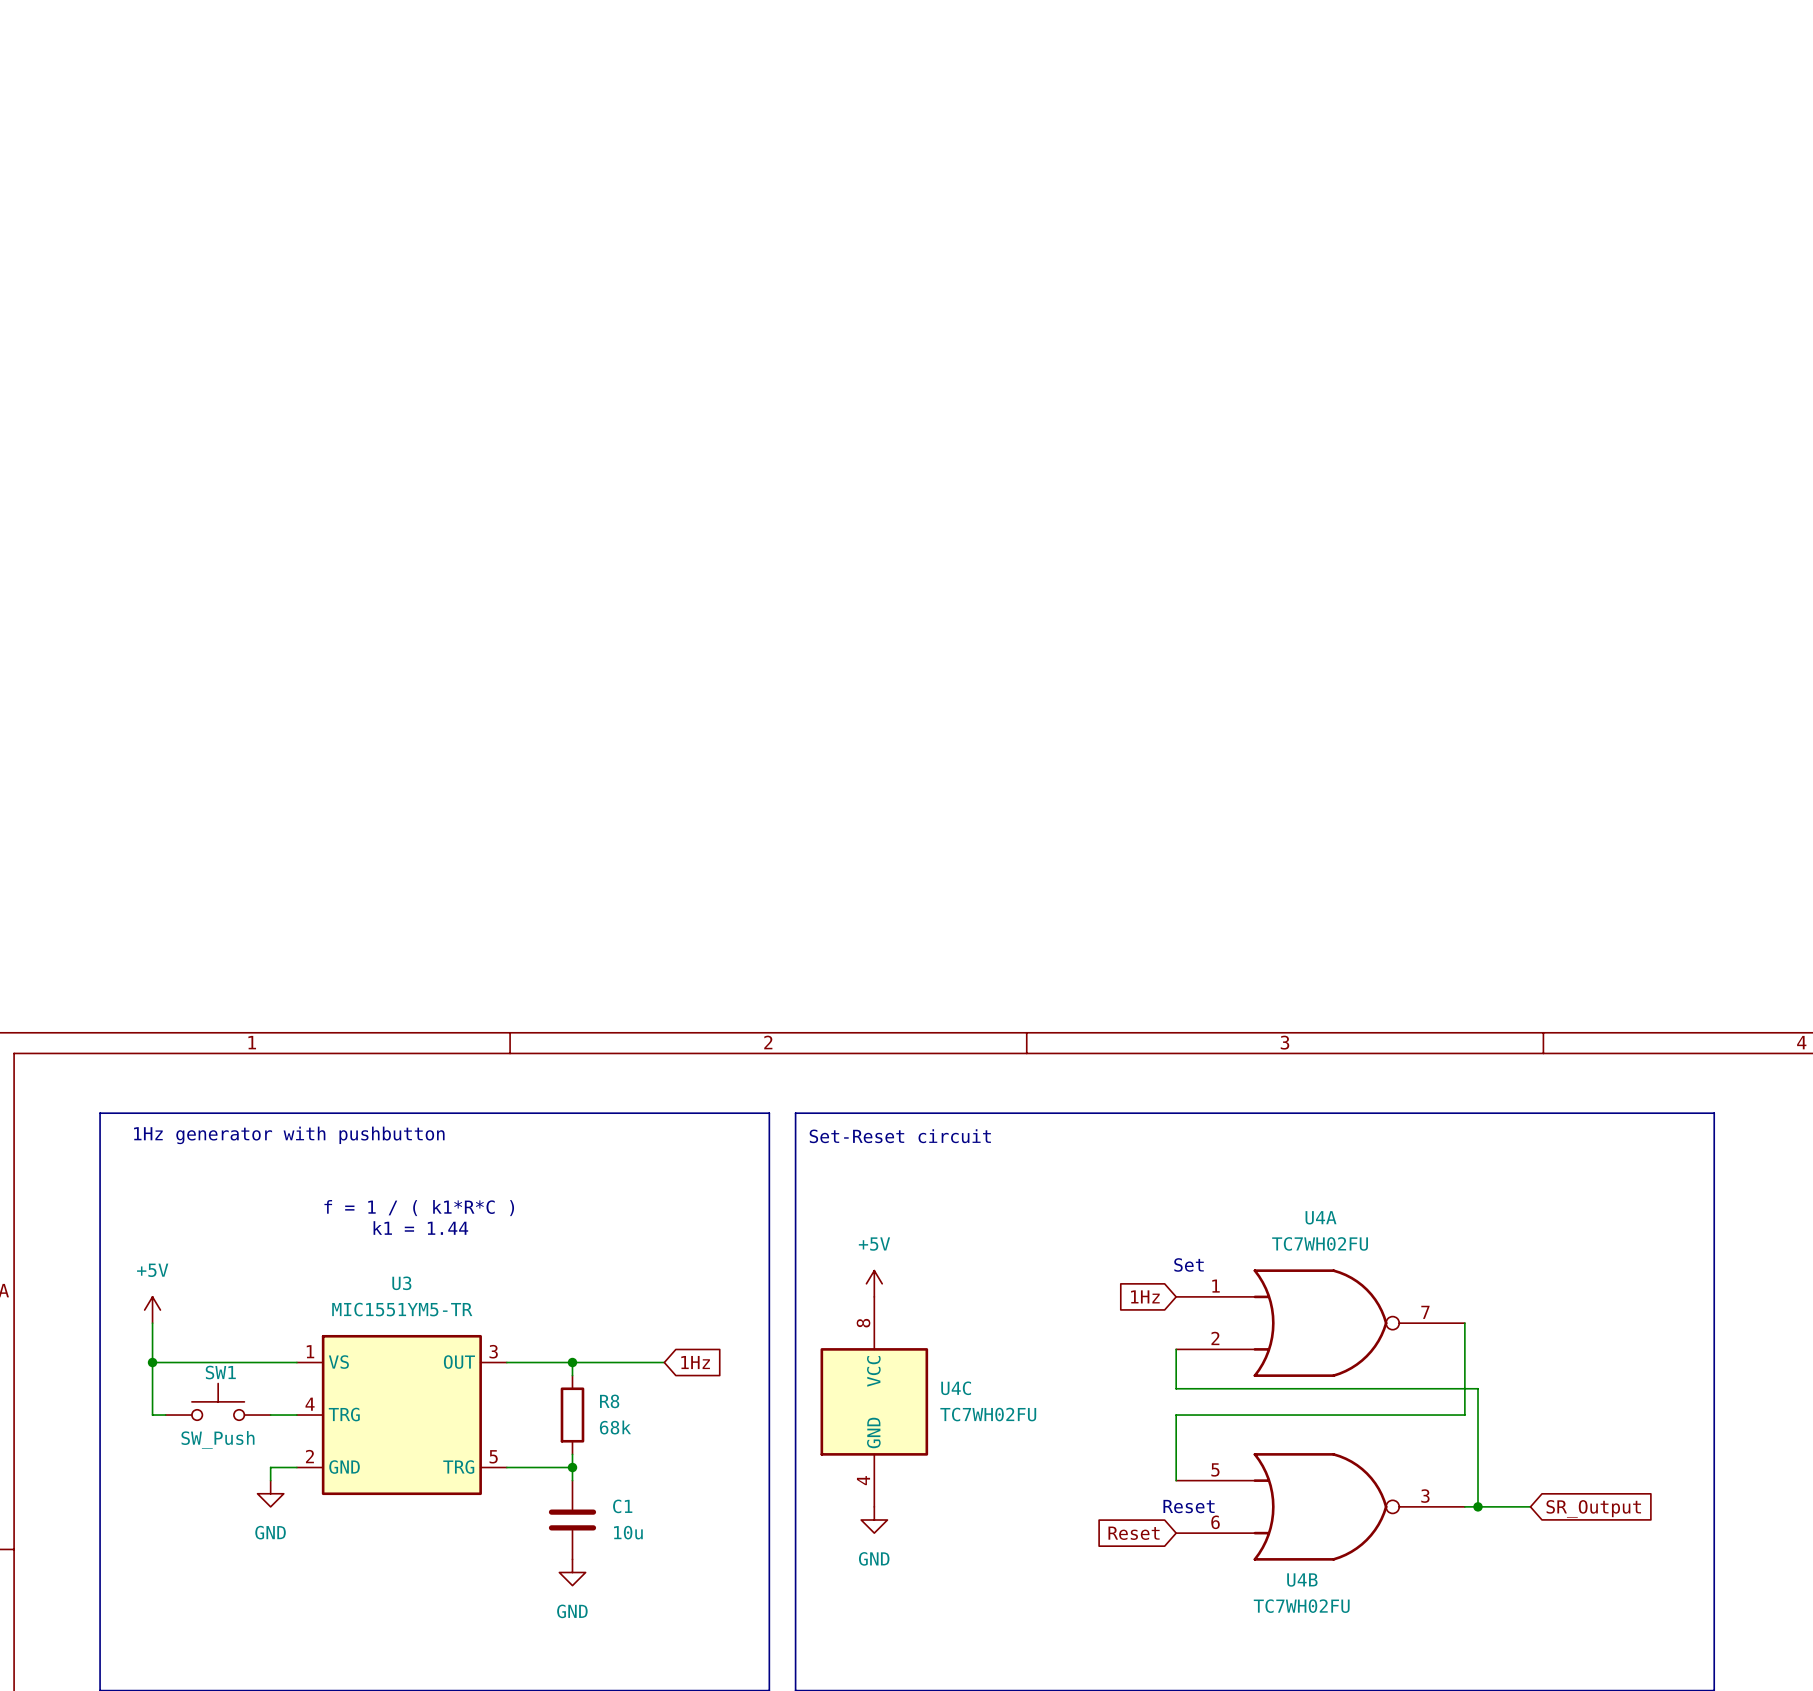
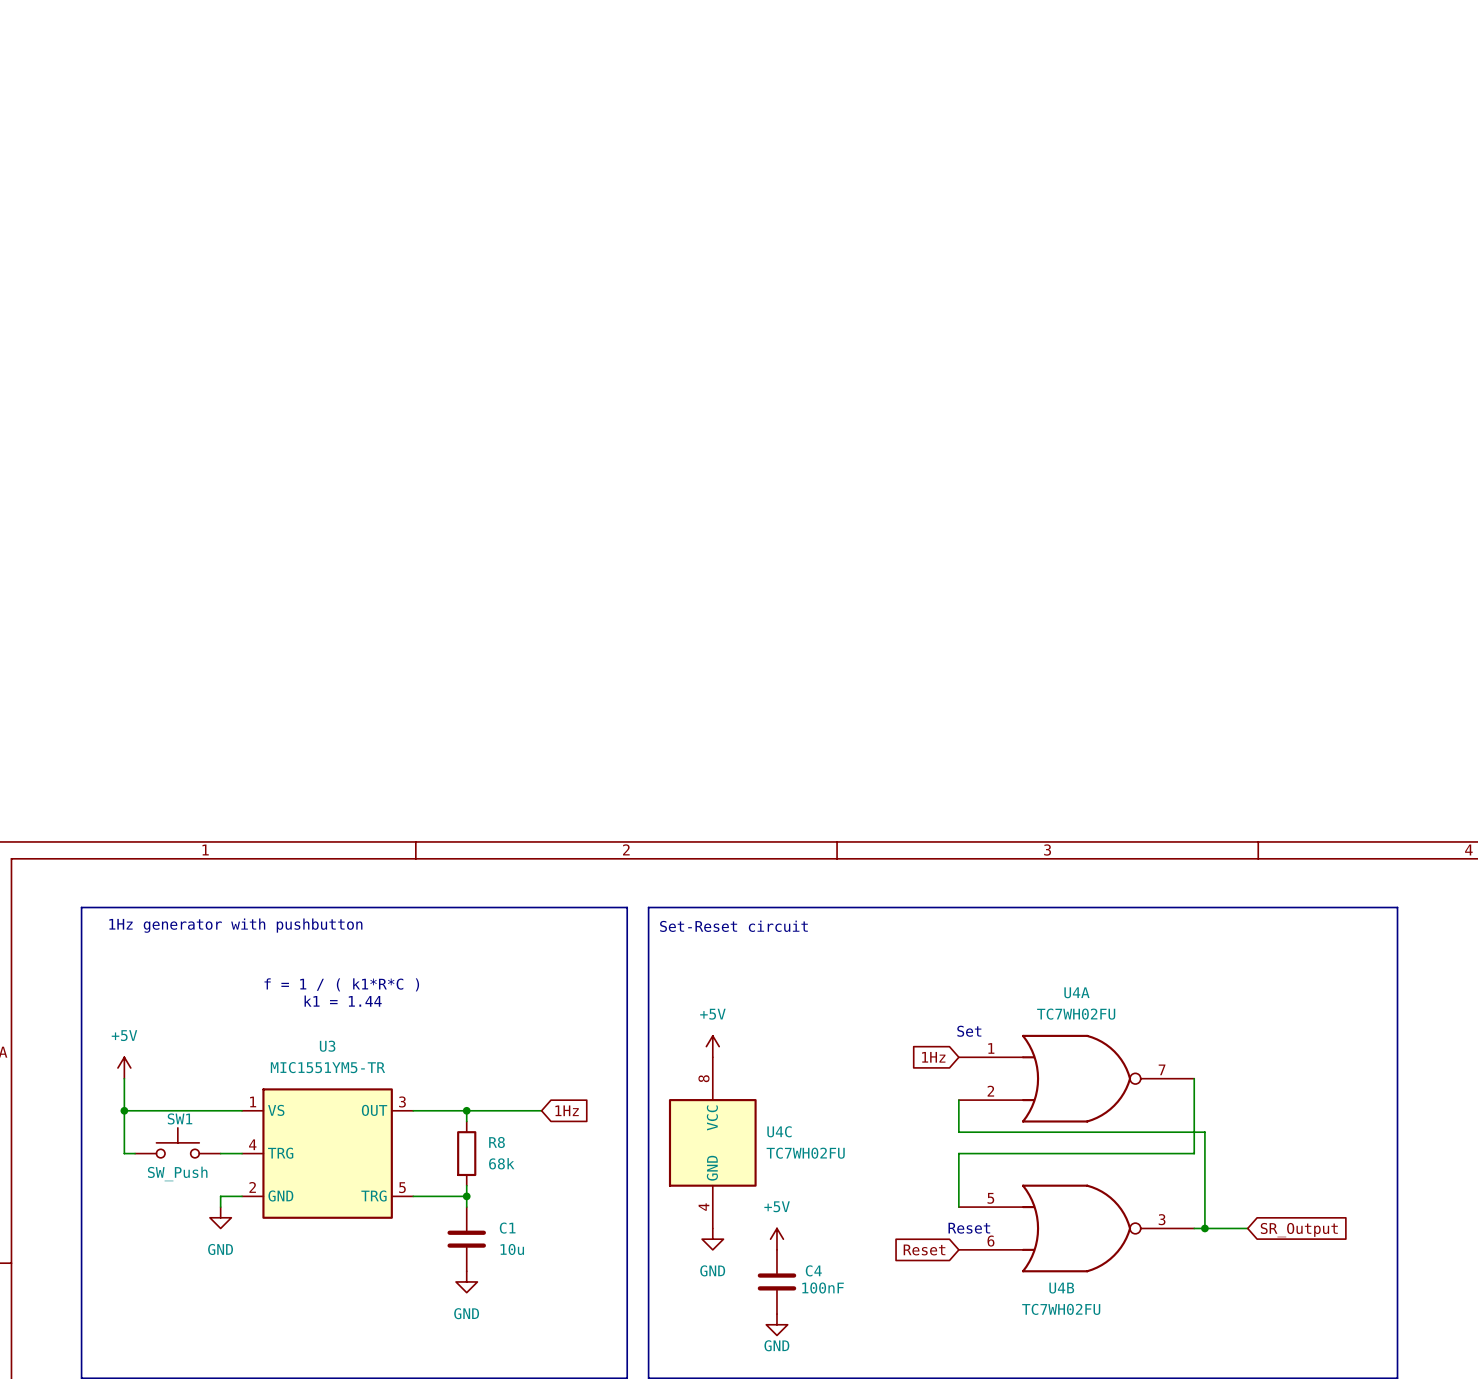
power symbol: none -> +5V (776, 1239)
C4: none -> 100nF (776, 1281)
power symbol: none -> GND (776, 1324)

